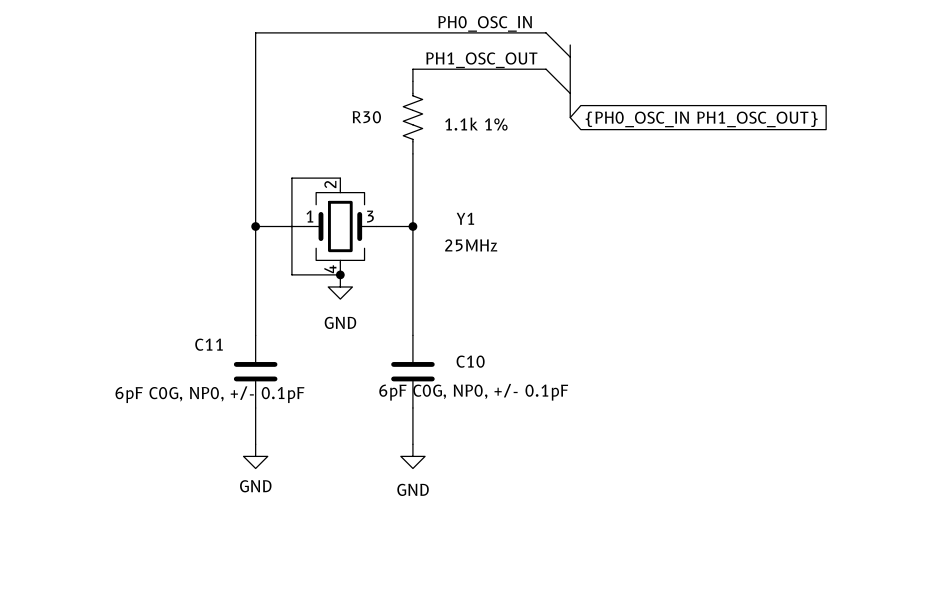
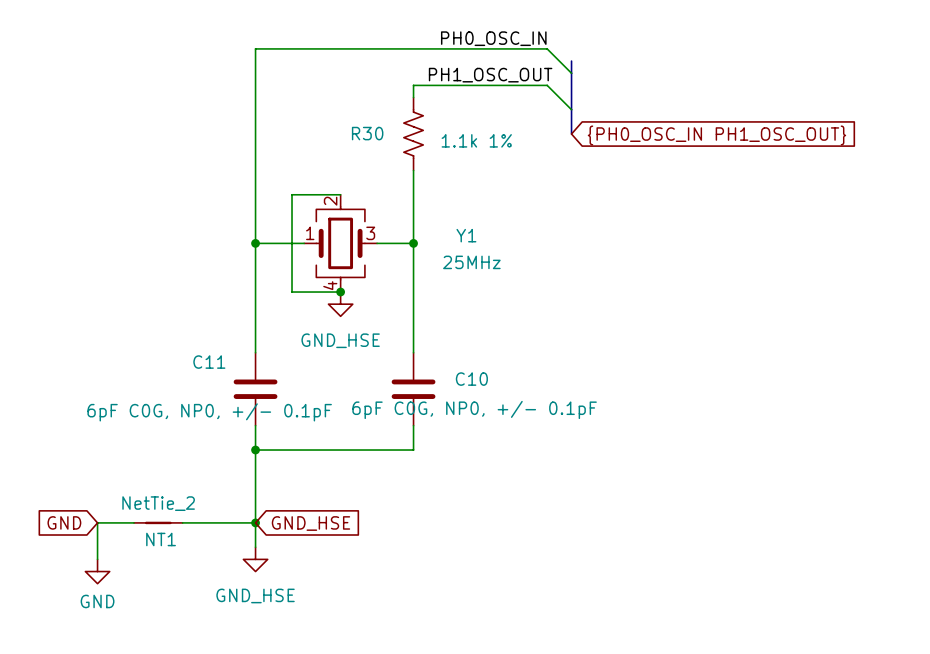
power symbol: GND (340, 287) -> GND_HSE (340, 304)
junction: none -> (255, 450)
wire: (412, 432) (412, 444) -> (413, 450) (255, 450)
wire: none -> (255, 462) (255, 547)
power symbol: GND (255, 456) -> none
power symbol: GND (412, 456) -> none
global label: none -> GND (64, 522)
wire: none -> (134, 522) (97, 522) (97, 559)
NT1: none -> NetTie_2 (158, 522)
wire: none -> (182, 522) (255, 522)
junction: none -> (255, 522)
global label: none -> GND_HSE (310, 523)
power symbol: none -> GND_HSE (255, 559)
power symbol: none -> GND (97, 571)

